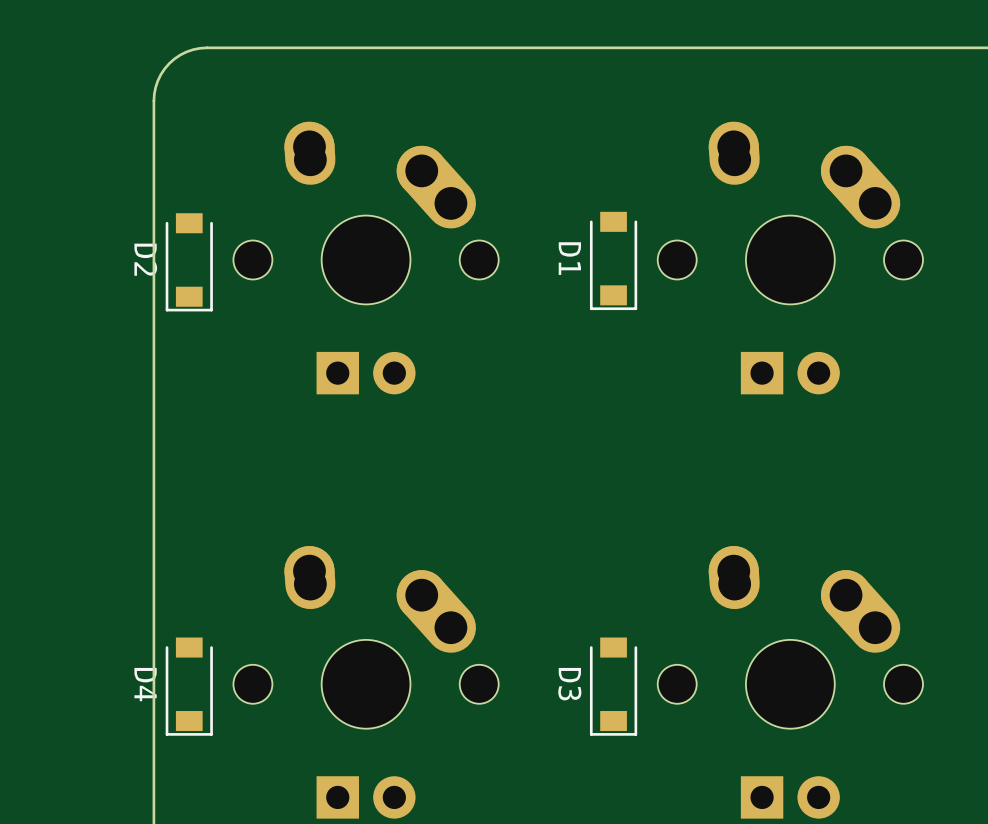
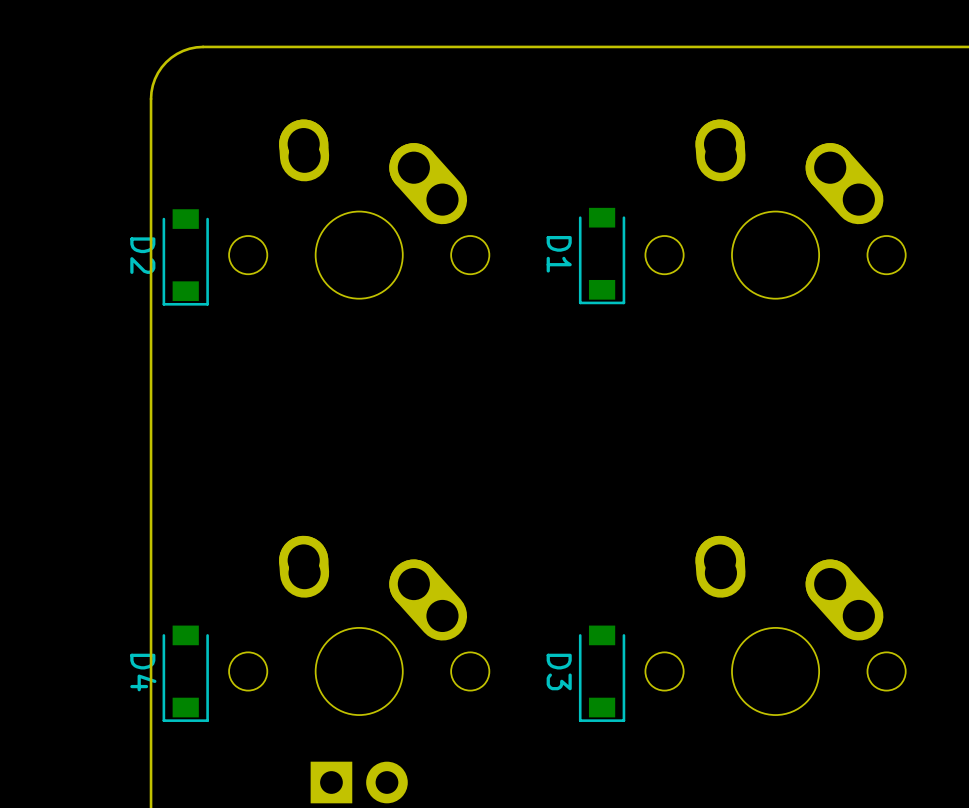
part: (366, 258) -> none
part: (790, 258) -> none
part: (790, 682) -> none

